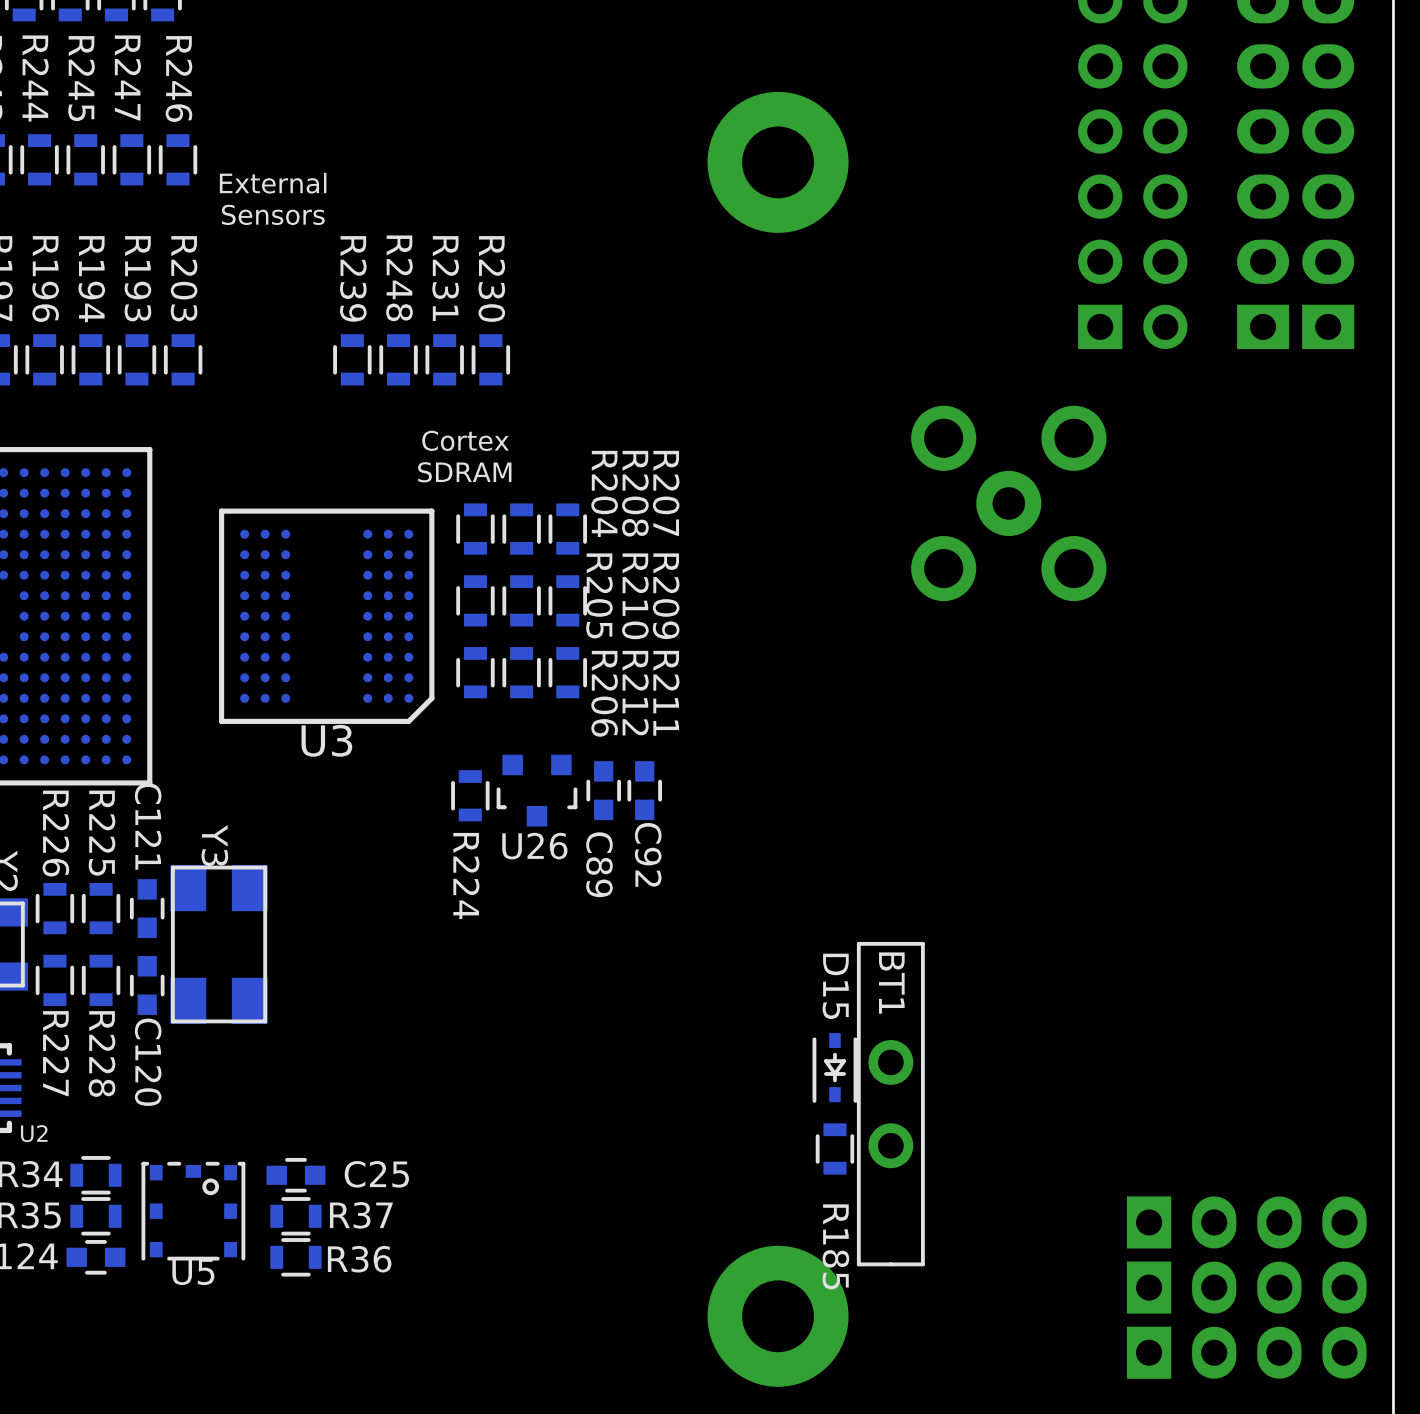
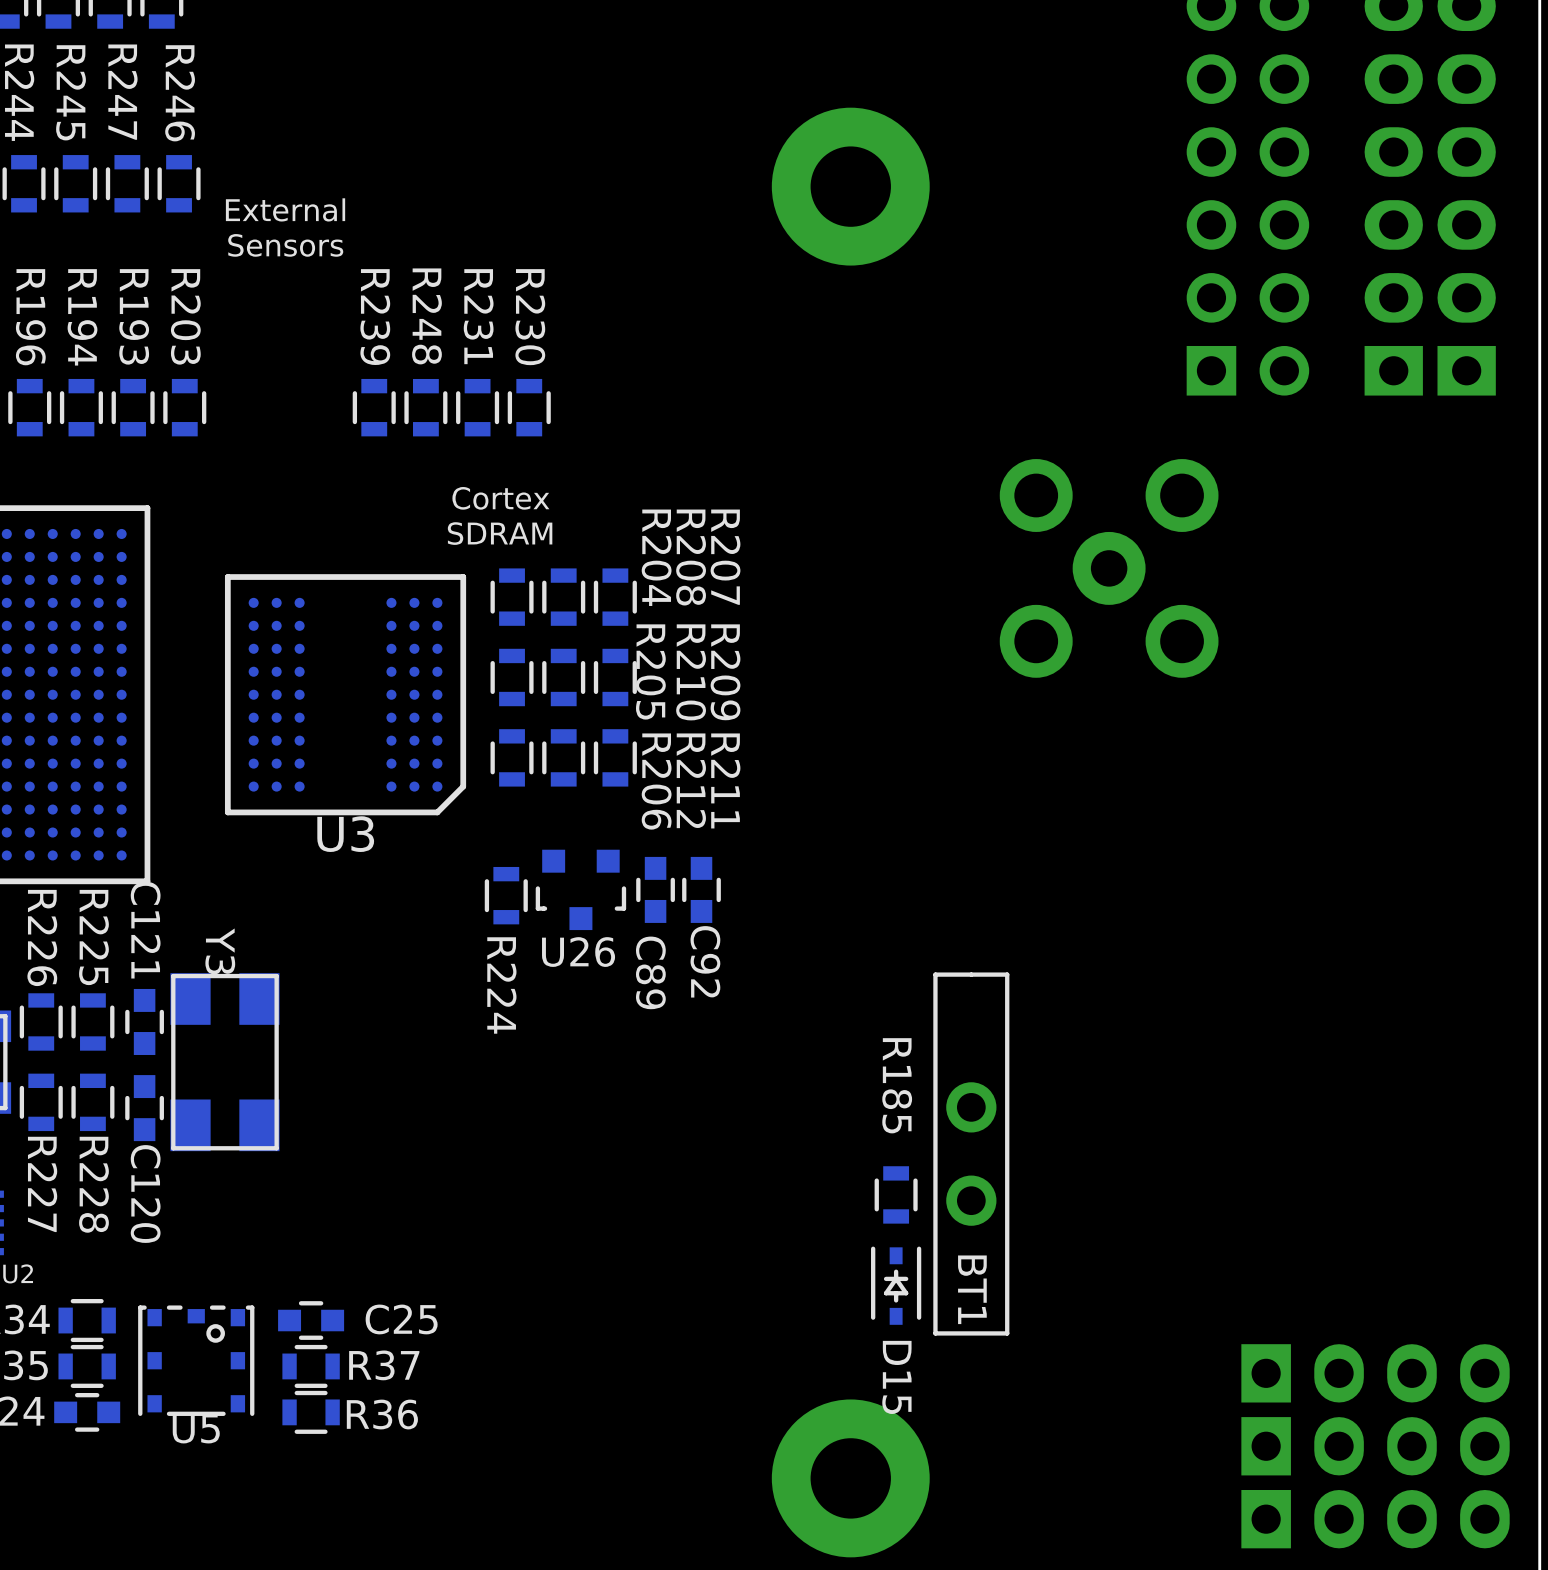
D15 rotation: 0° (834, 1067) -> 180° (896, 1285)
D15 position: (834, 1067) -> (896, 1285)
BT1 rotation: 0° (890, 1104) -> 180° (971, 1154)
R185 position: (834, 1148) -> (896, 1194)
R185 name position: R185 (835, 1246) -> R185 (897, 1085)

